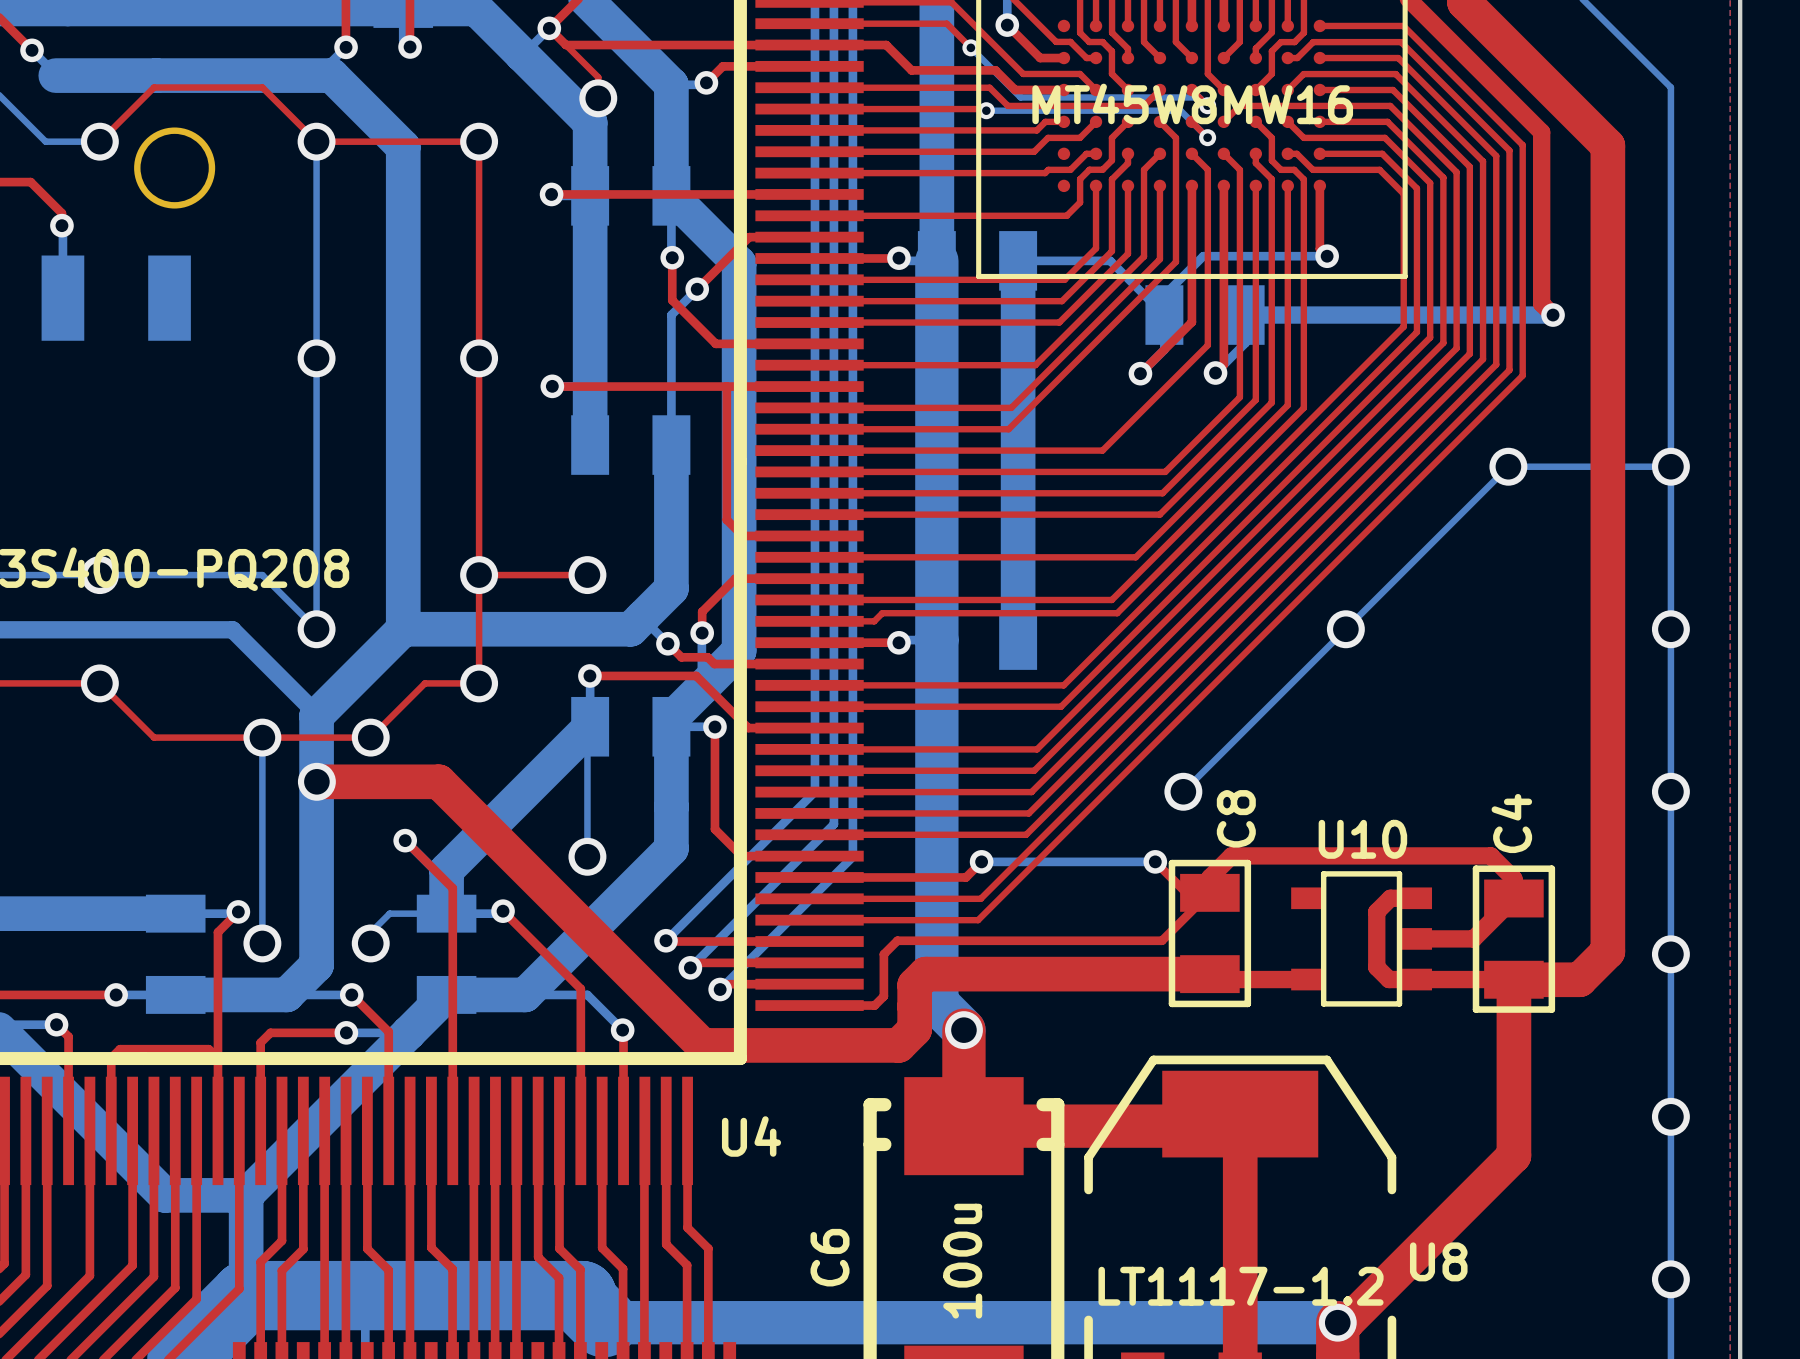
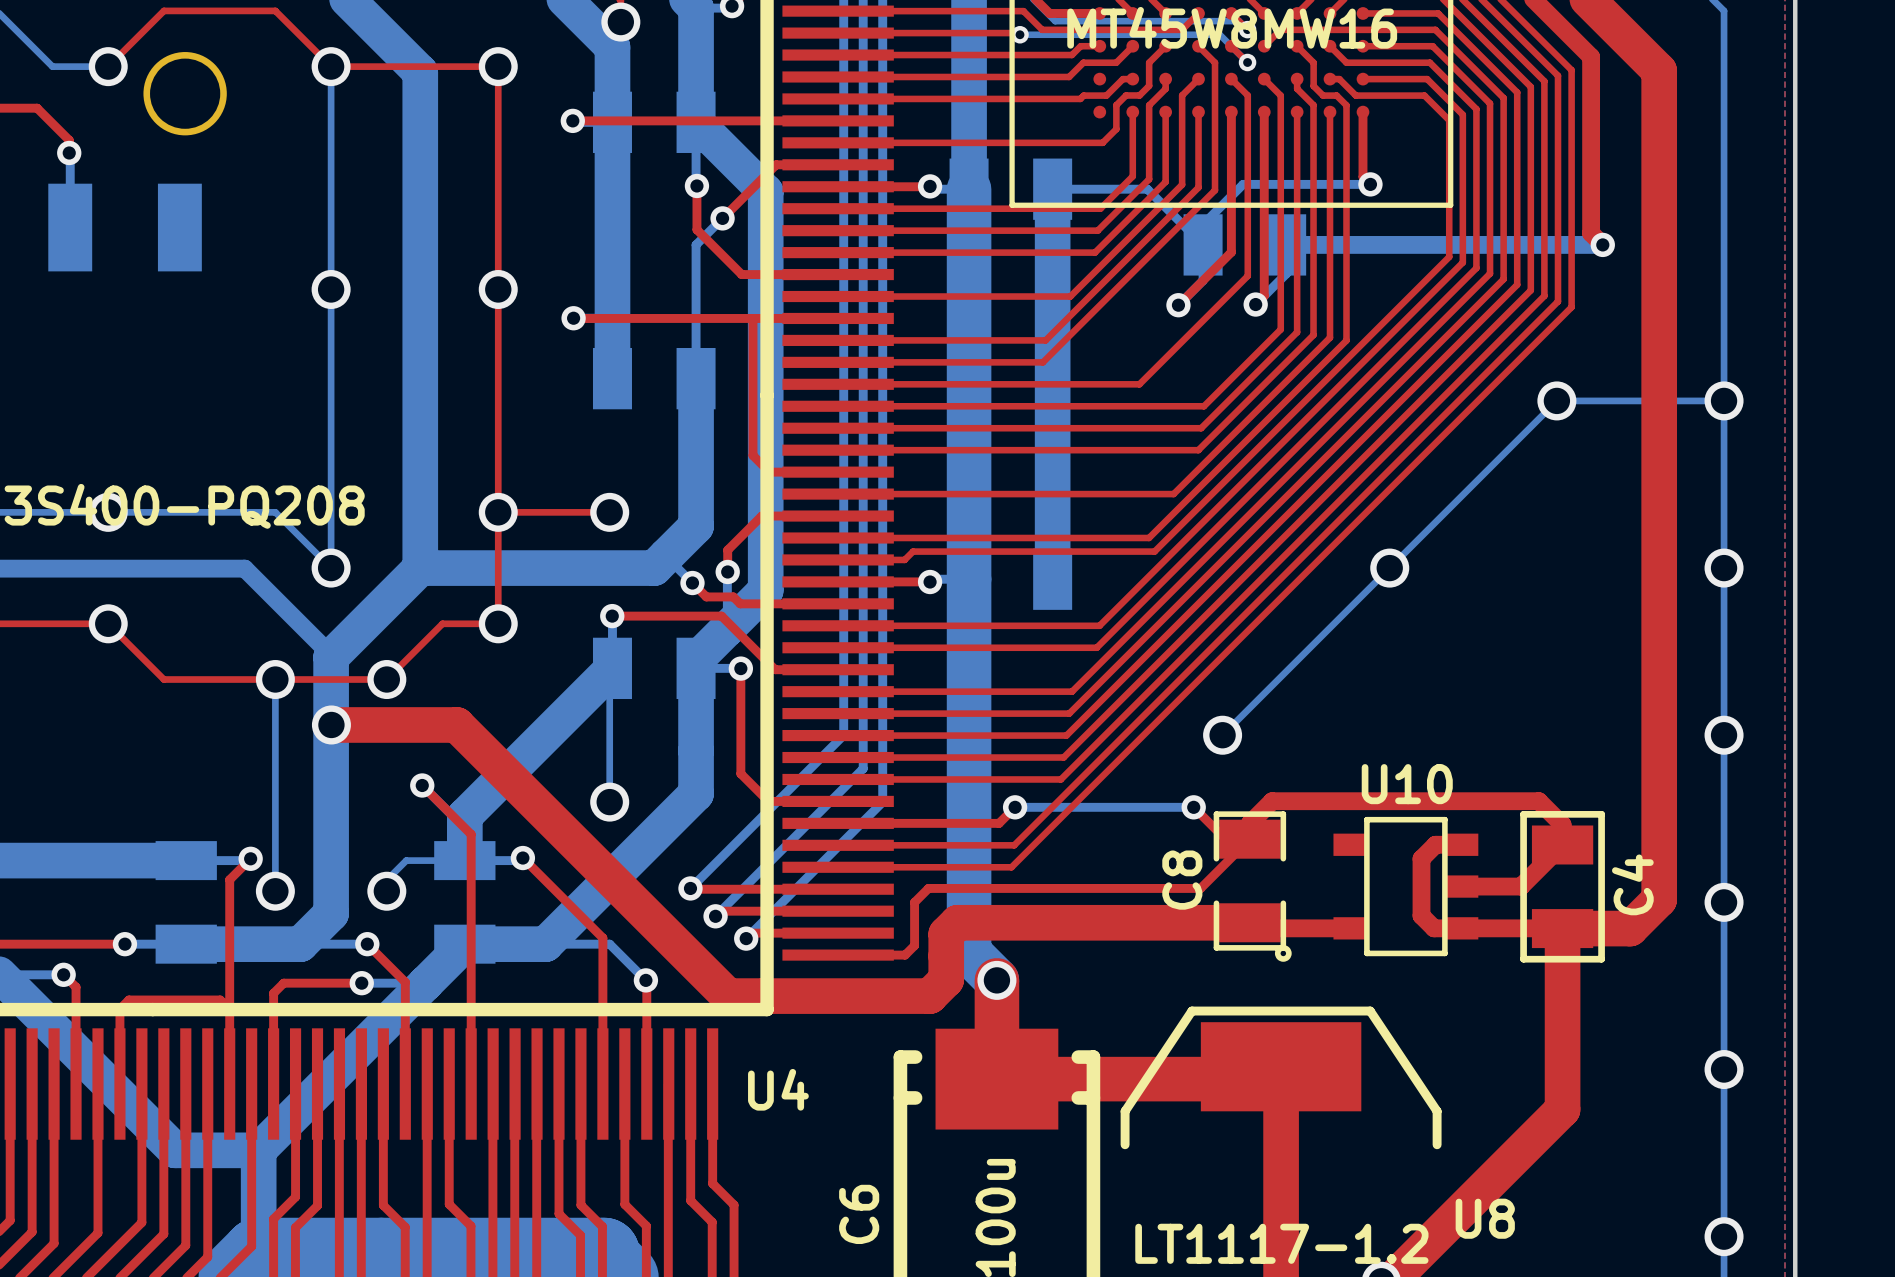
C8 name position: C8 (1236, 818) -> C8 (1182, 880)
C4 name position: C4 (1511, 823) -> C4 (1632, 884)
C8 footprint: [1168, 859, 1252, 1008] -> [1213, 811, 1292, 962]

